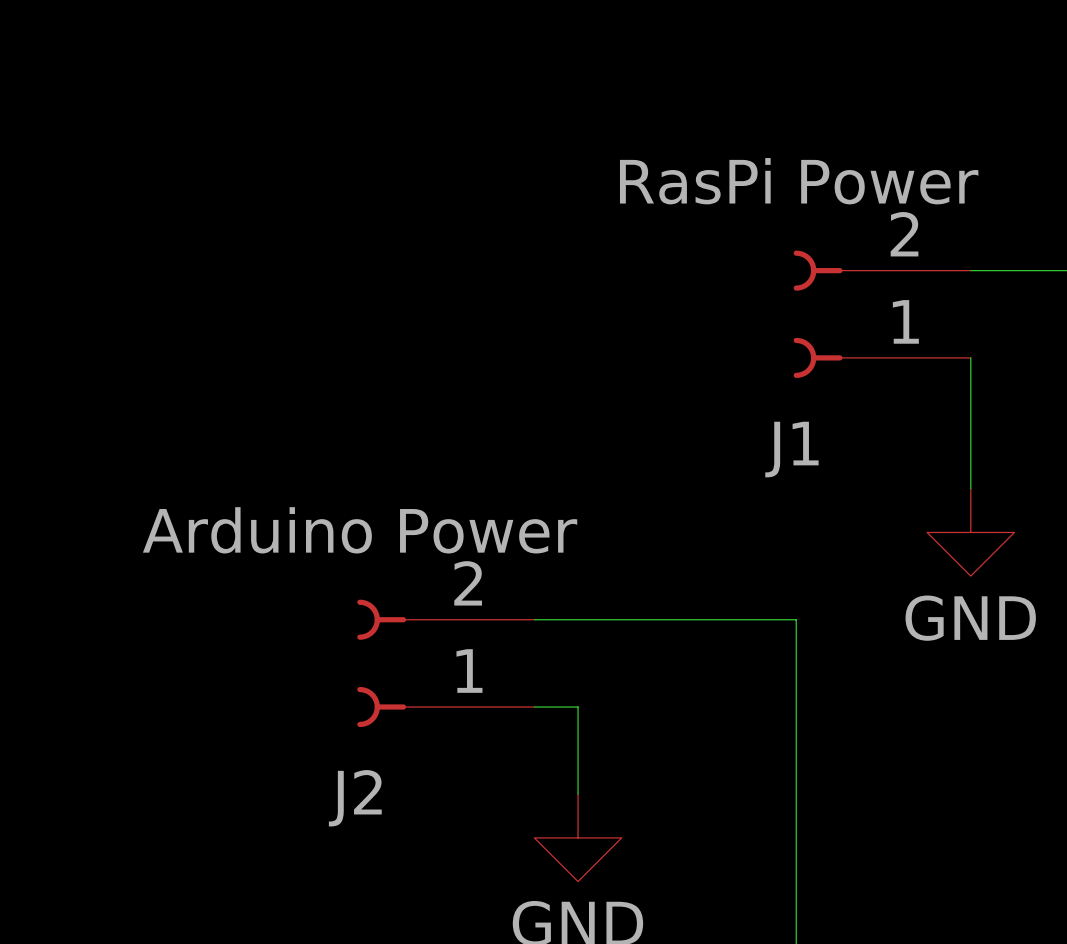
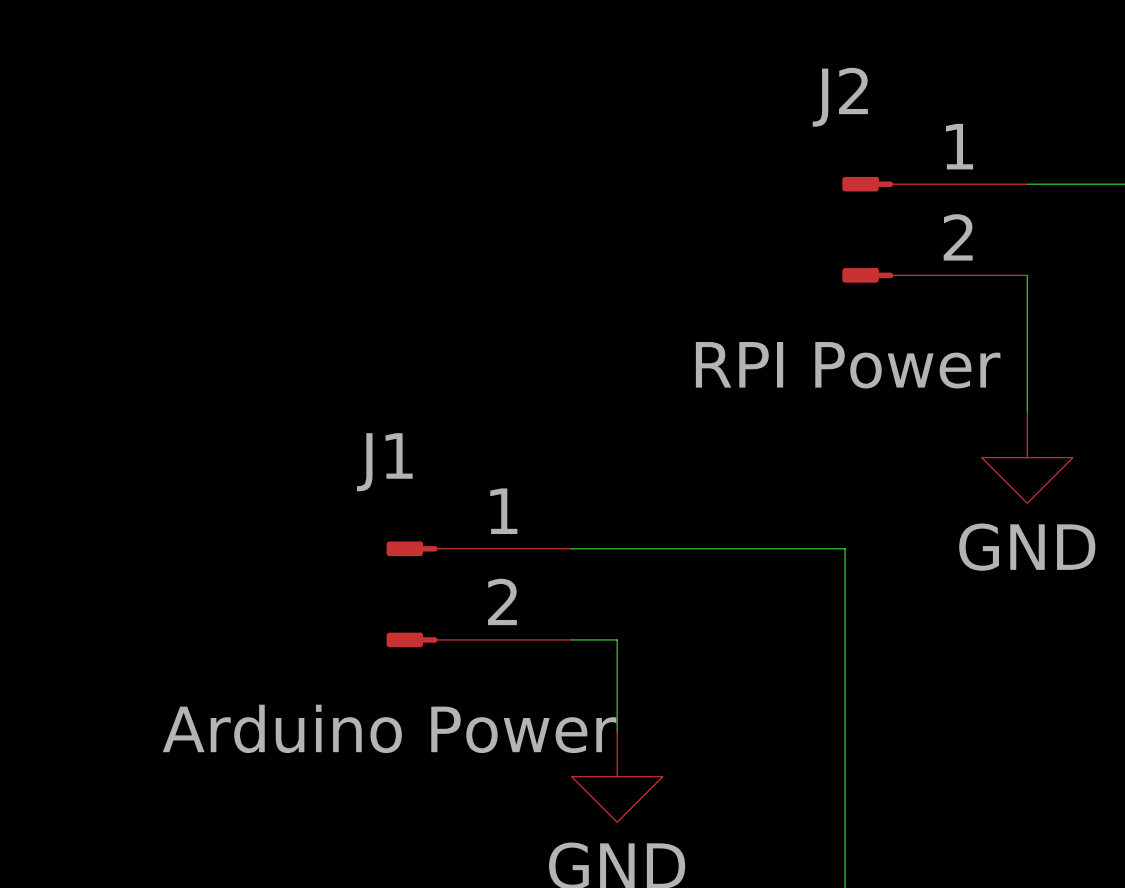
J1 value: RasPi Power (799, 181) -> Arduino Power (389, 728)
J1 symbol: [793, 250, 971, 378] -> [386, 541, 572, 648]
J1 name position: J1 (791, 449) -> J1 (384, 462)
J2 value: Arduino Power (360, 530) -> RPI Power (848, 365)
J2 symbol: [357, 599, 535, 728] -> [842, 176, 1028, 283]
J2 name position: J2 (355, 798) -> J2 (840, 97)

